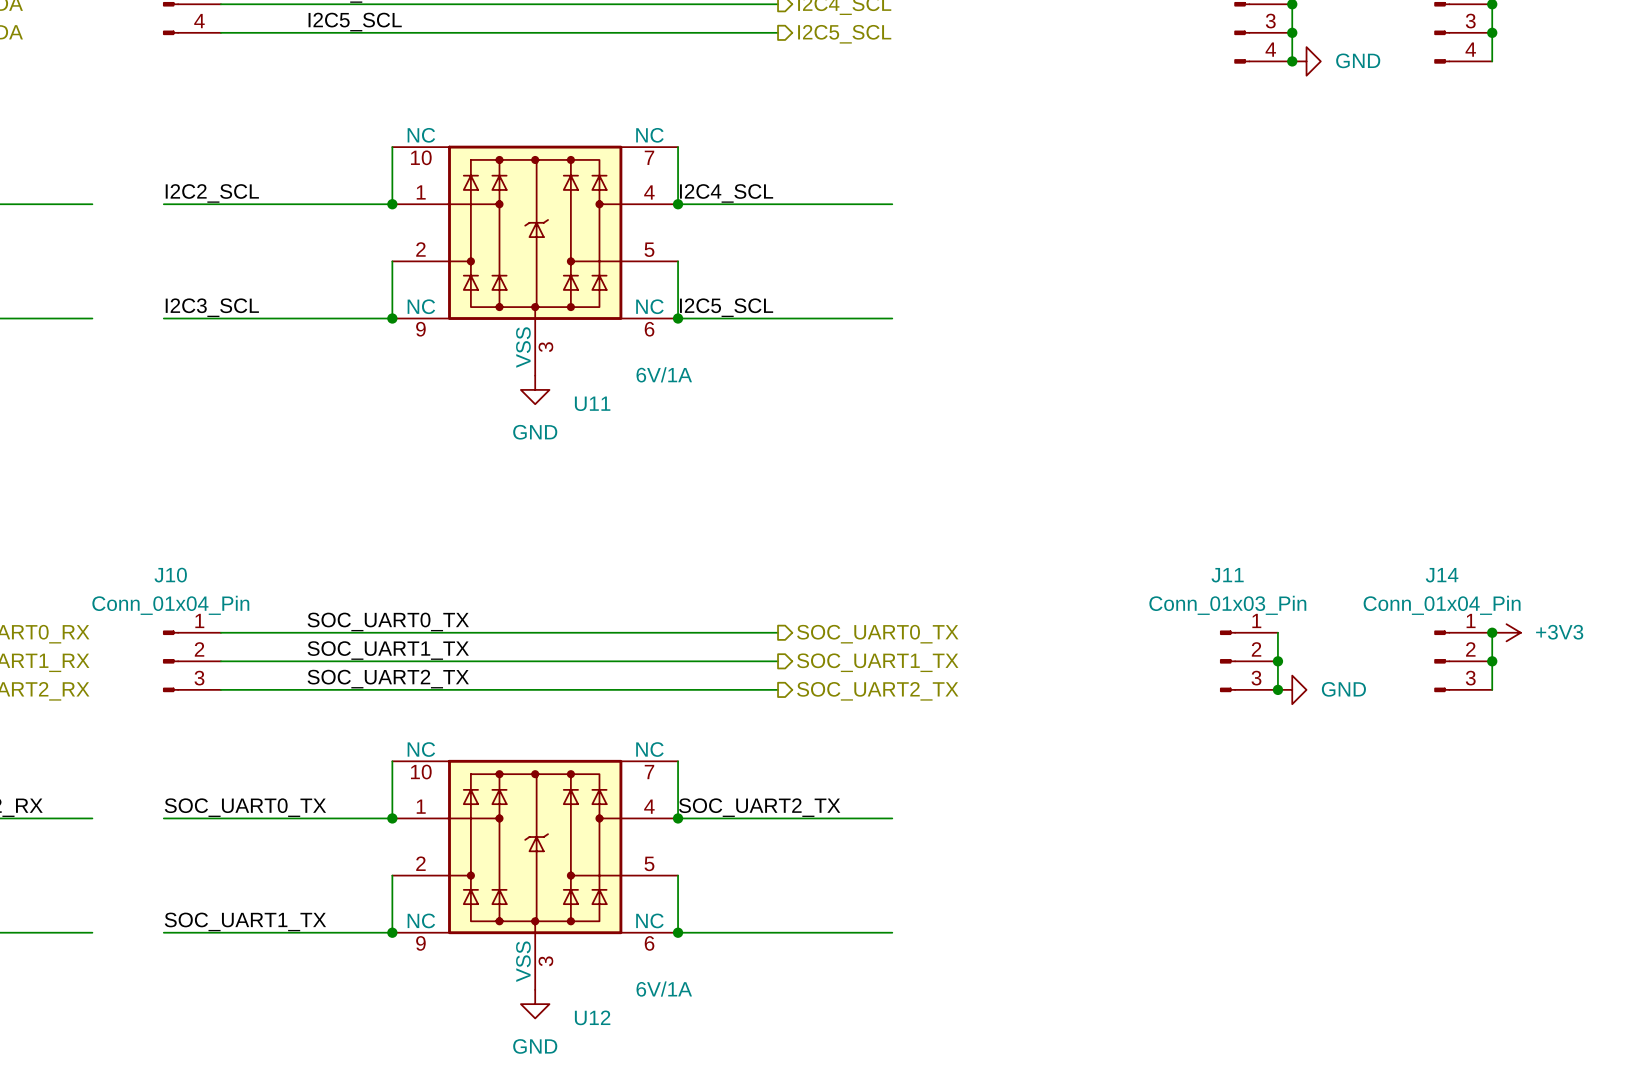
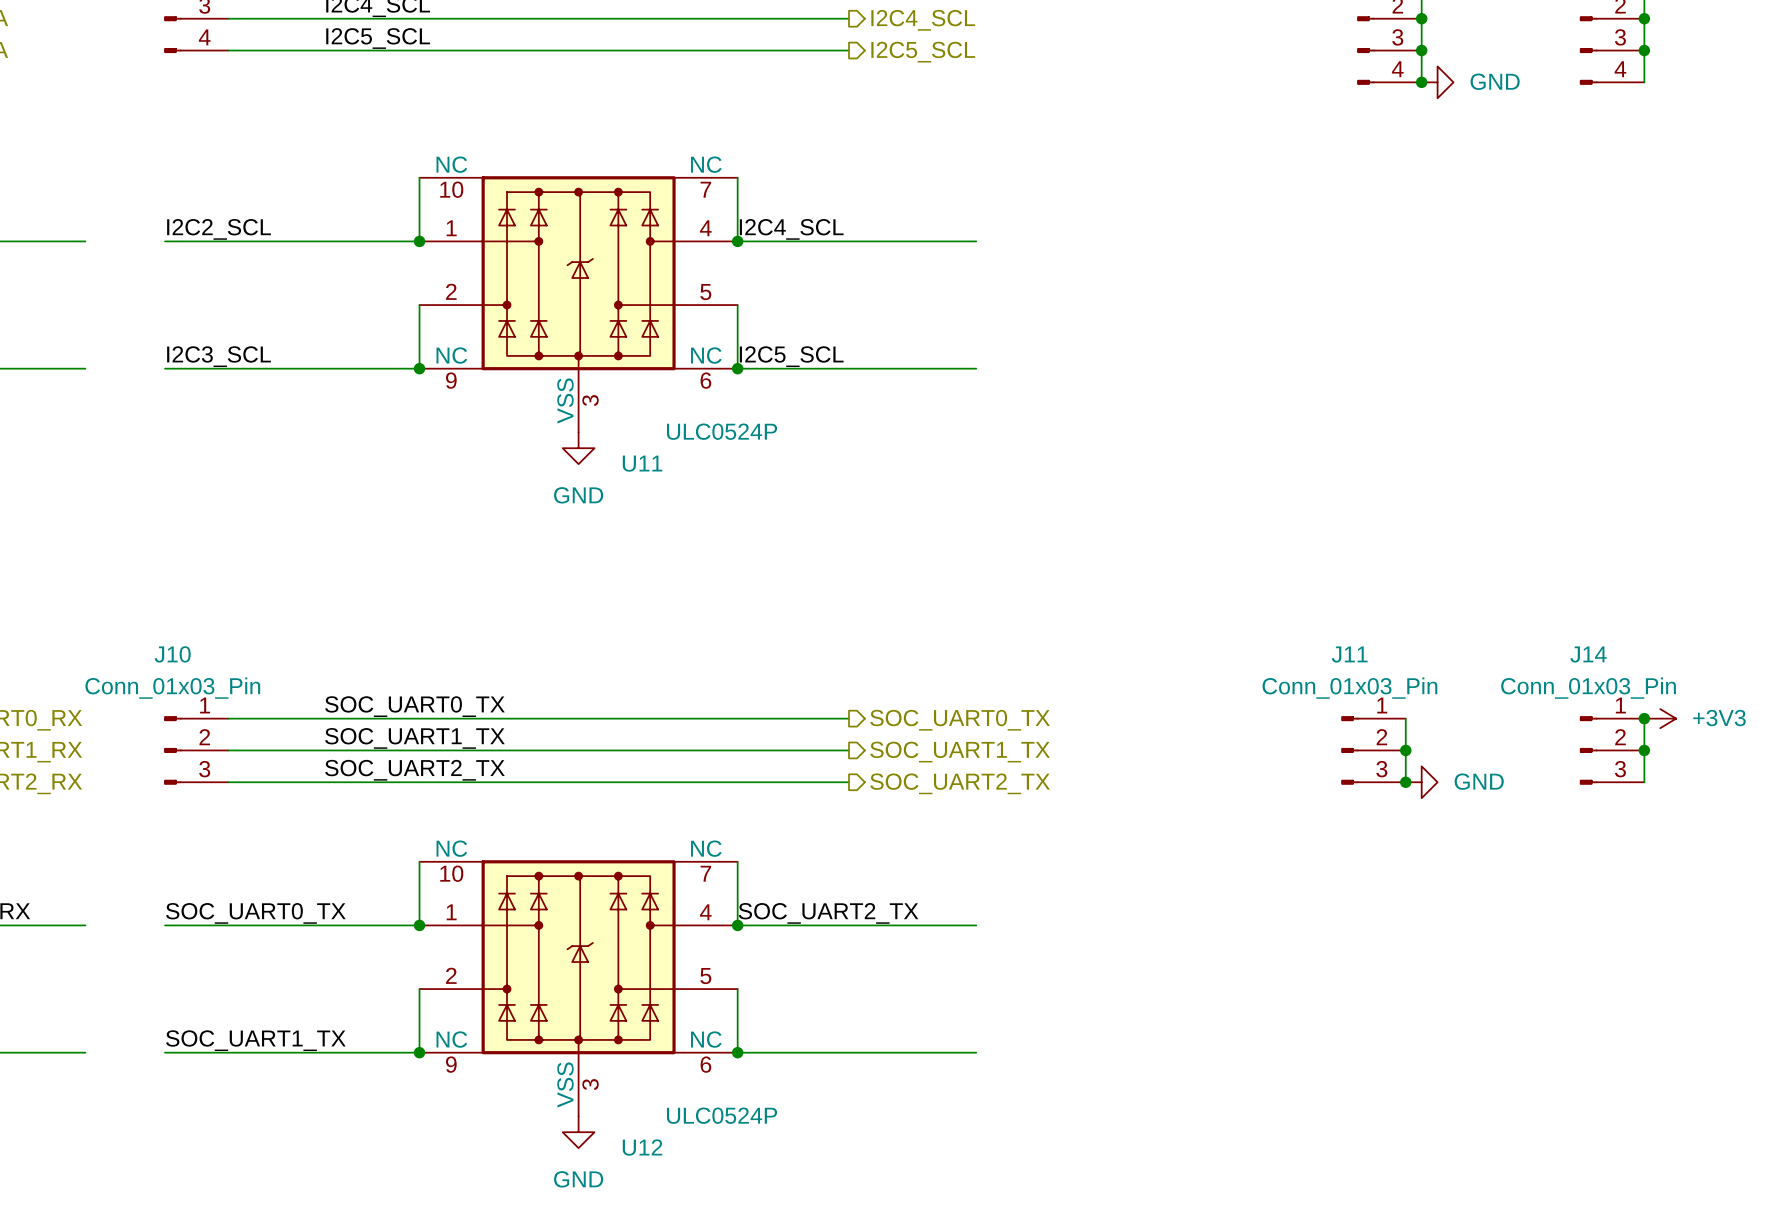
U11 value: 6V/1A (664, 374) -> ULC0524P (722, 431)
J10 value: Conn_01x04_Pin (170, 605) -> Conn_01x03_Pin (172, 688)
J14 value: Conn_01x04_Pin (1442, 605) -> Conn_01x03_Pin (1588, 688)
U12 value: 6V/1A (664, 989) -> ULC0524P (722, 1115)

